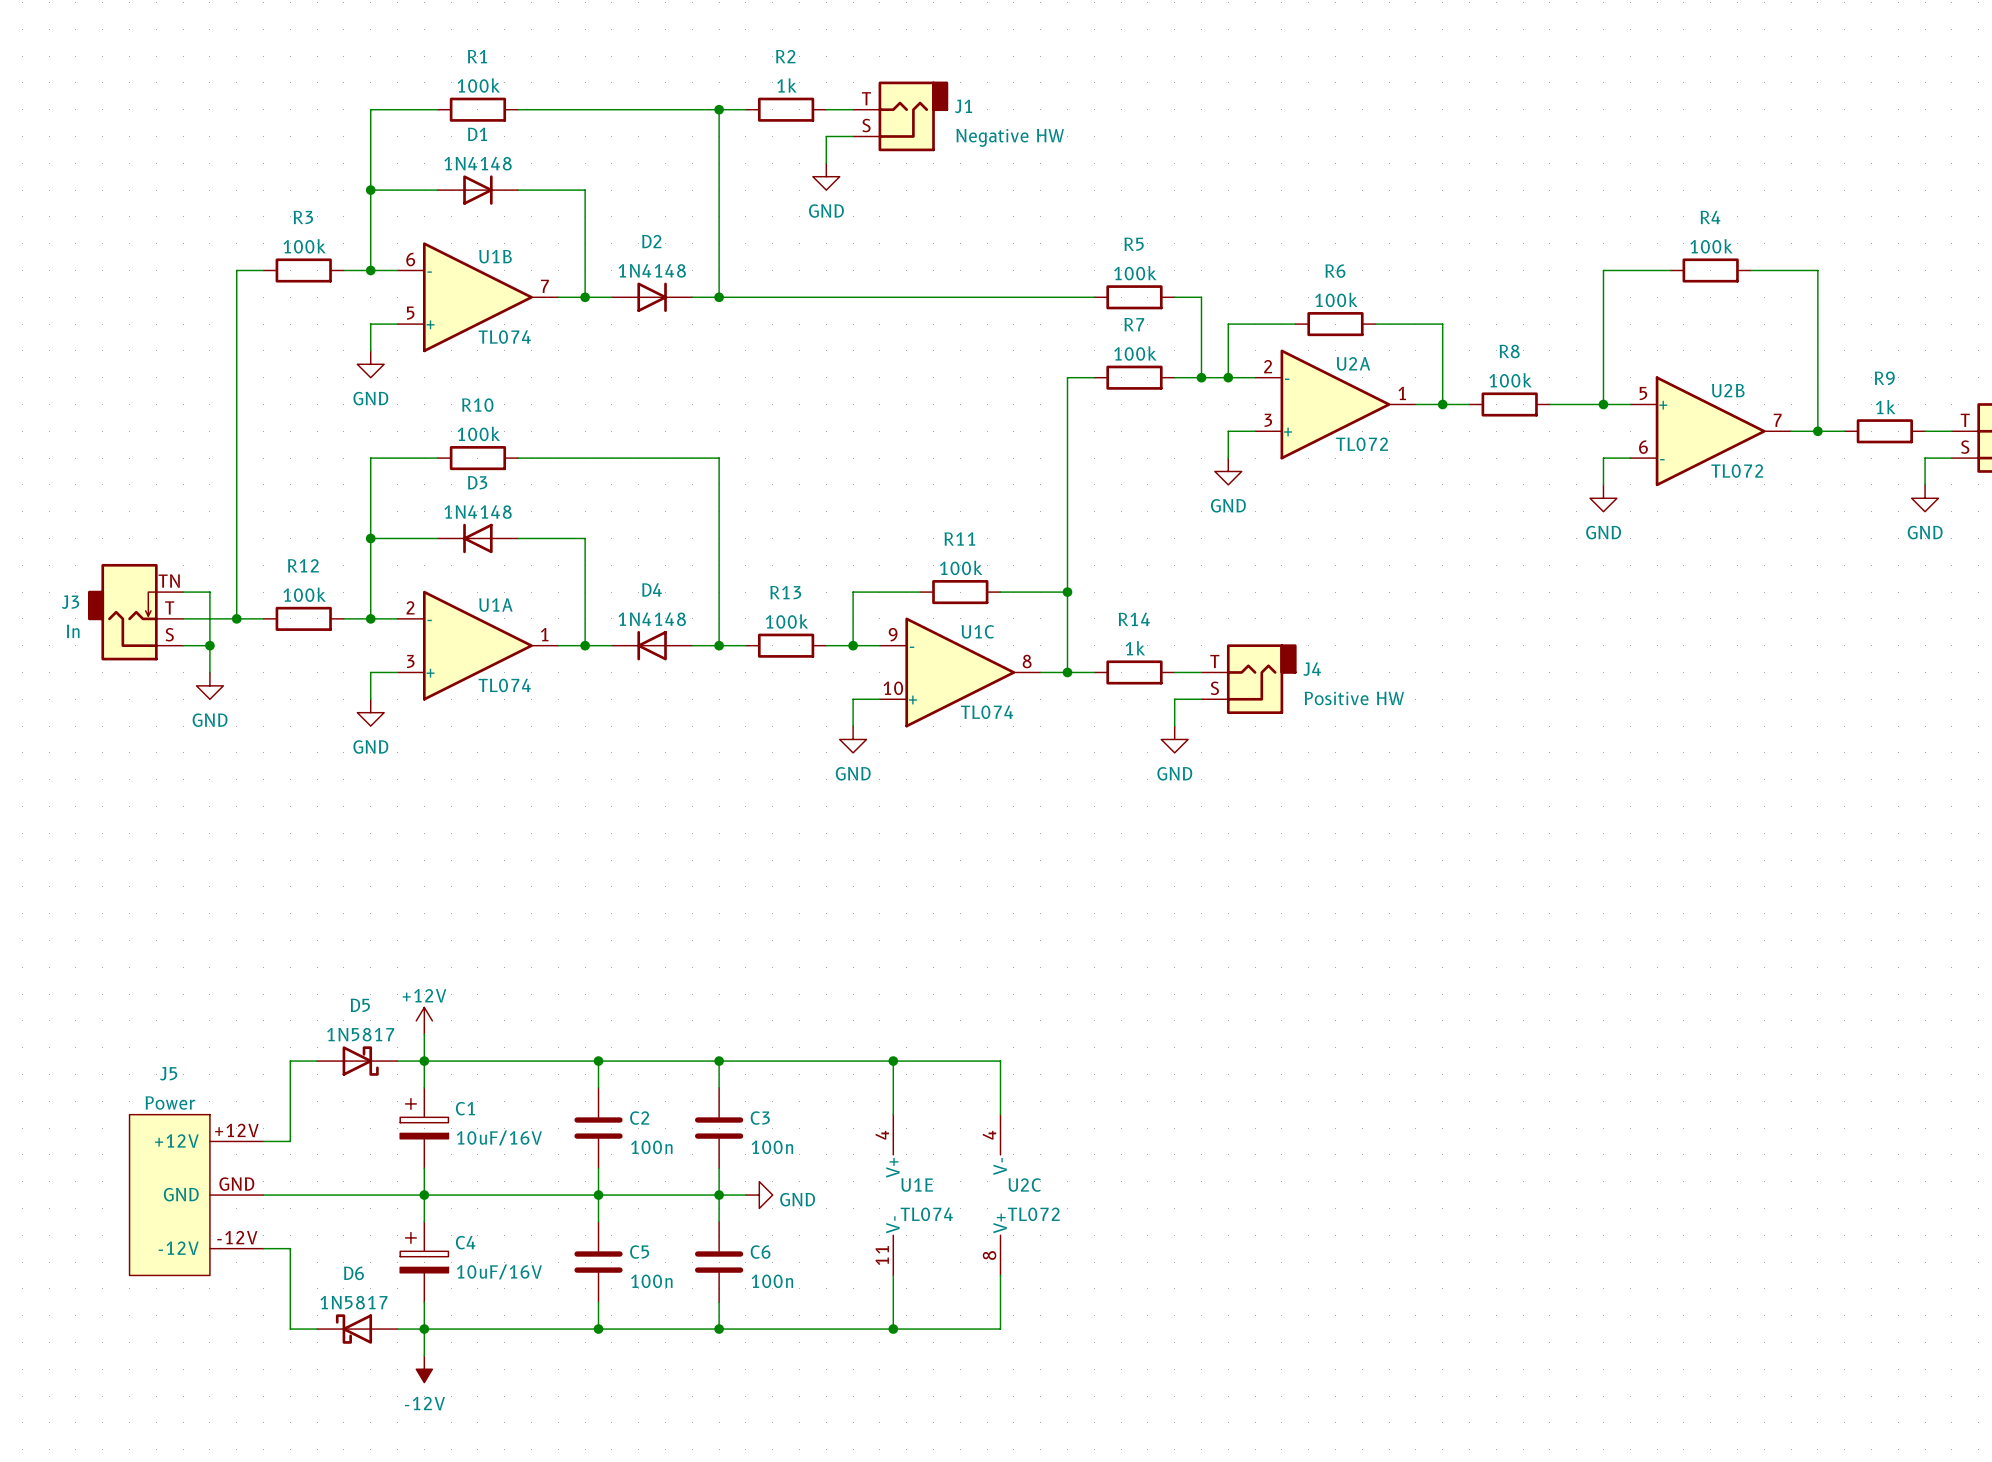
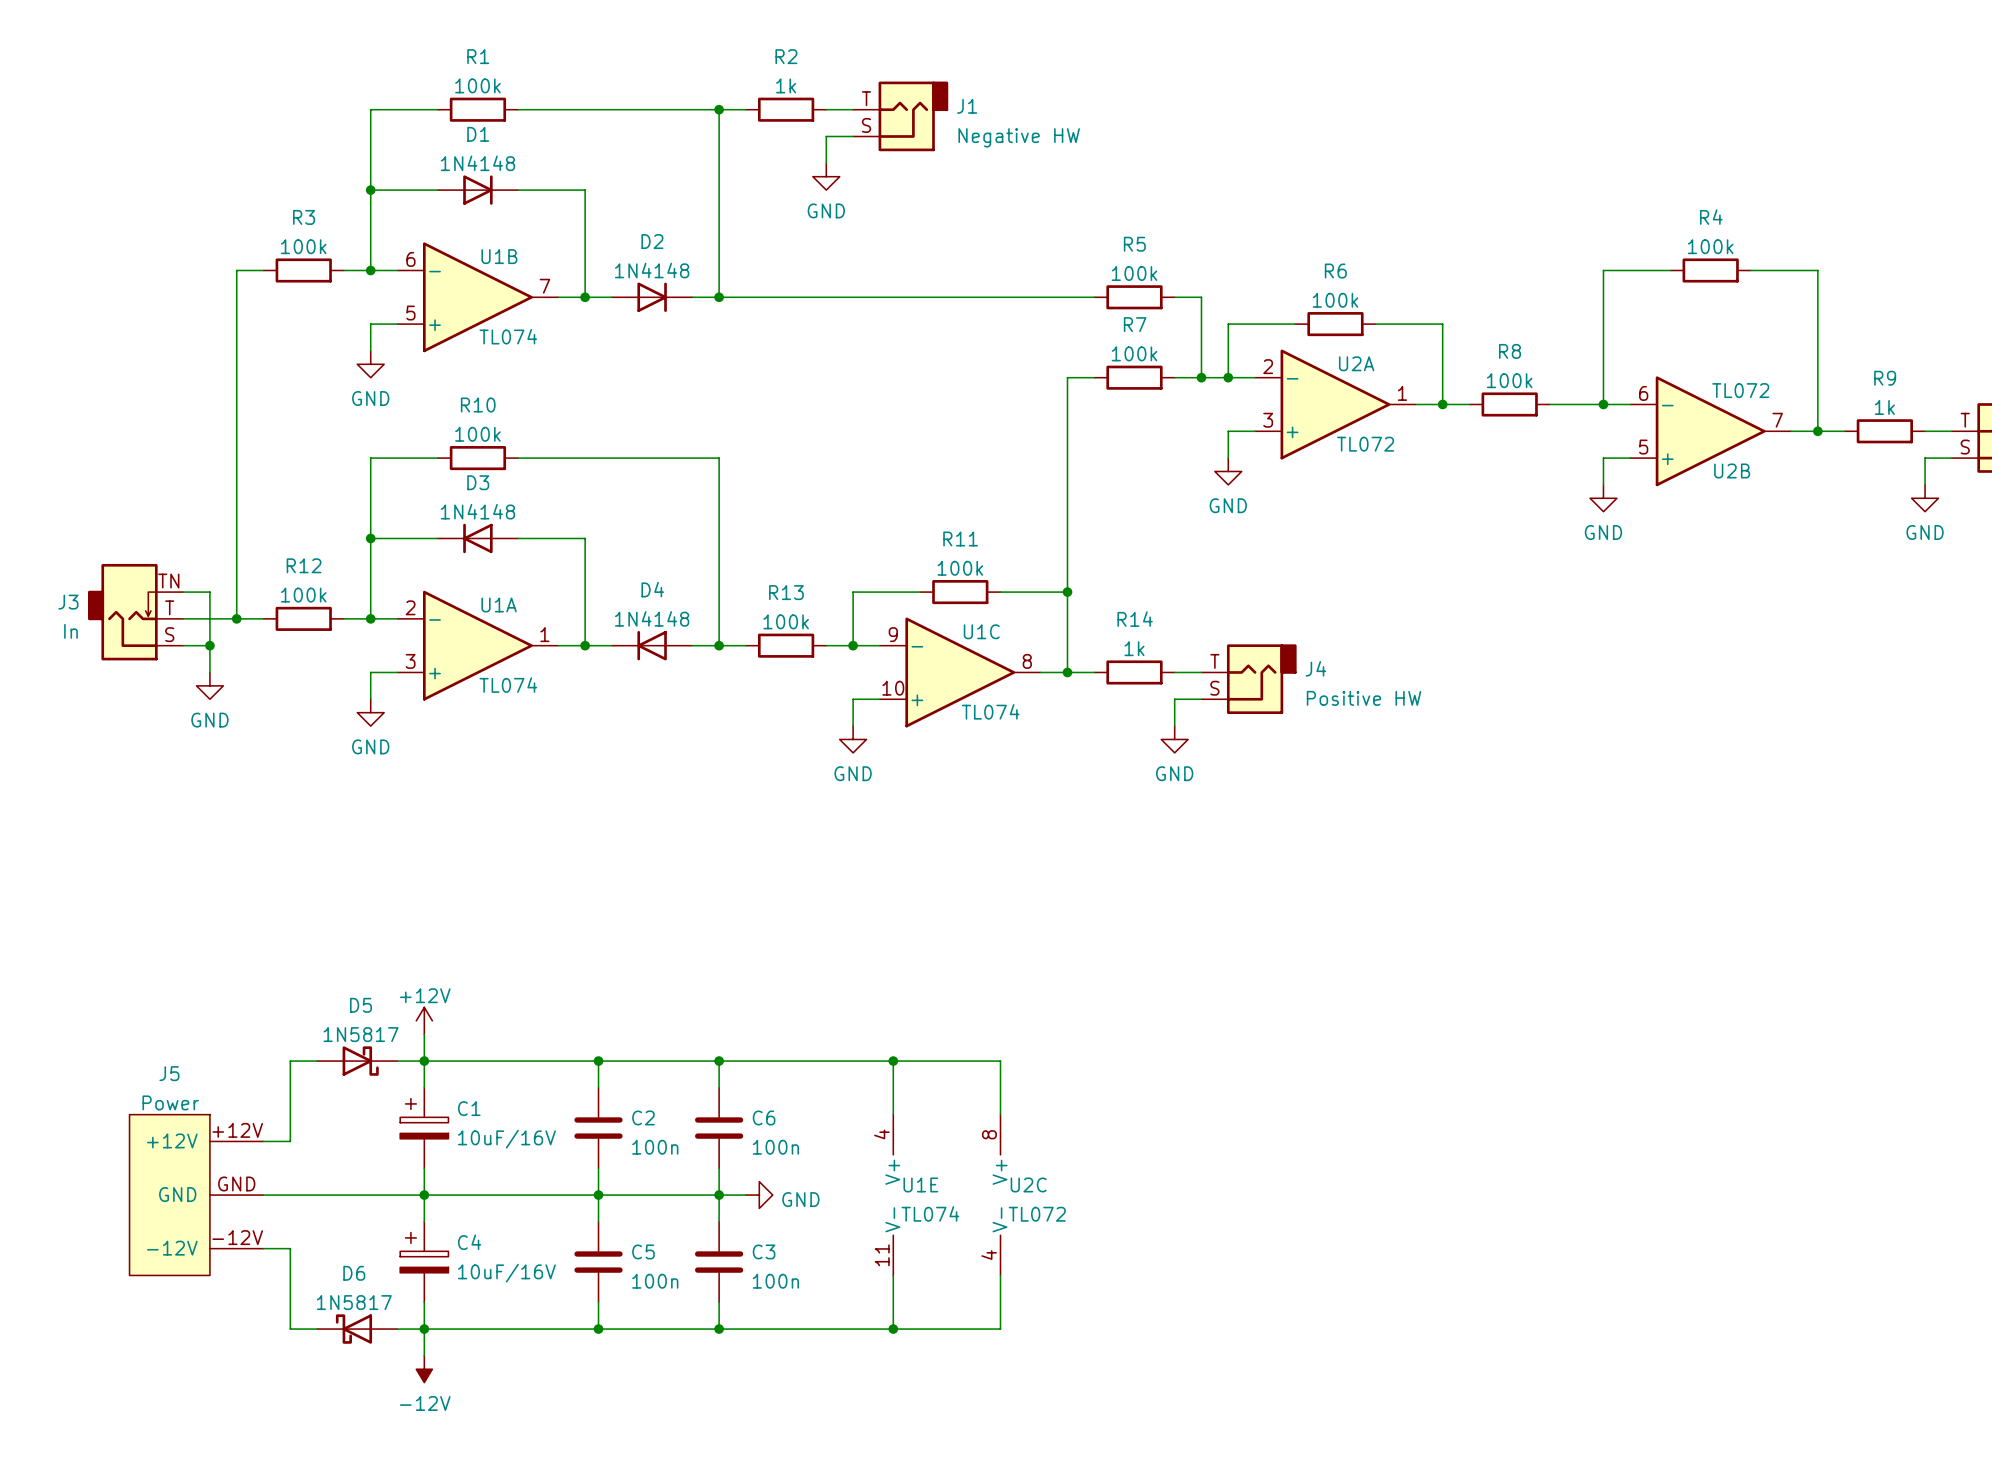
U2B flip: as is (1710, 431) -> up-down (1710, 431)
C3 name: C3 (760, 1118) -> C6 (764, 1117)
U2C rotation: 0° (1000, 1195) -> 180° (1000, 1195)
C6 name: C6 (760, 1252) -> C3 (764, 1251)

